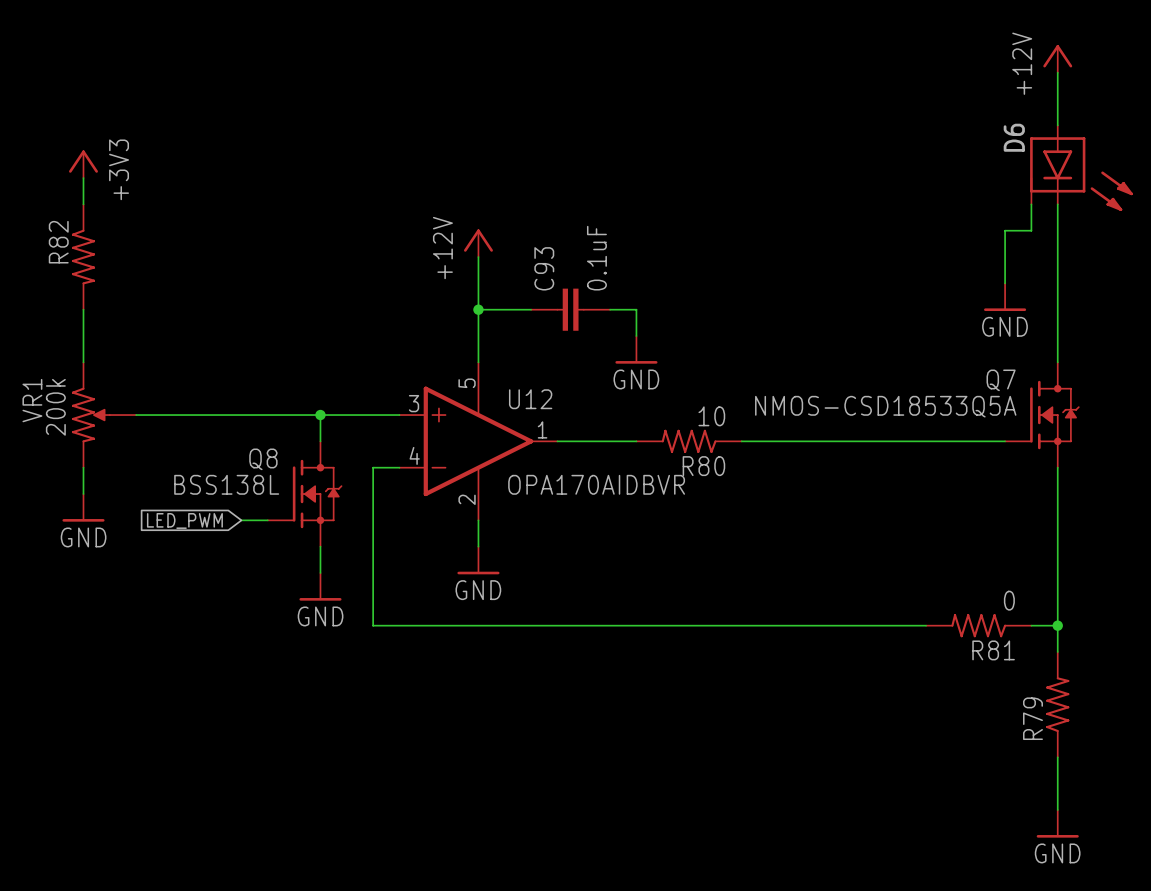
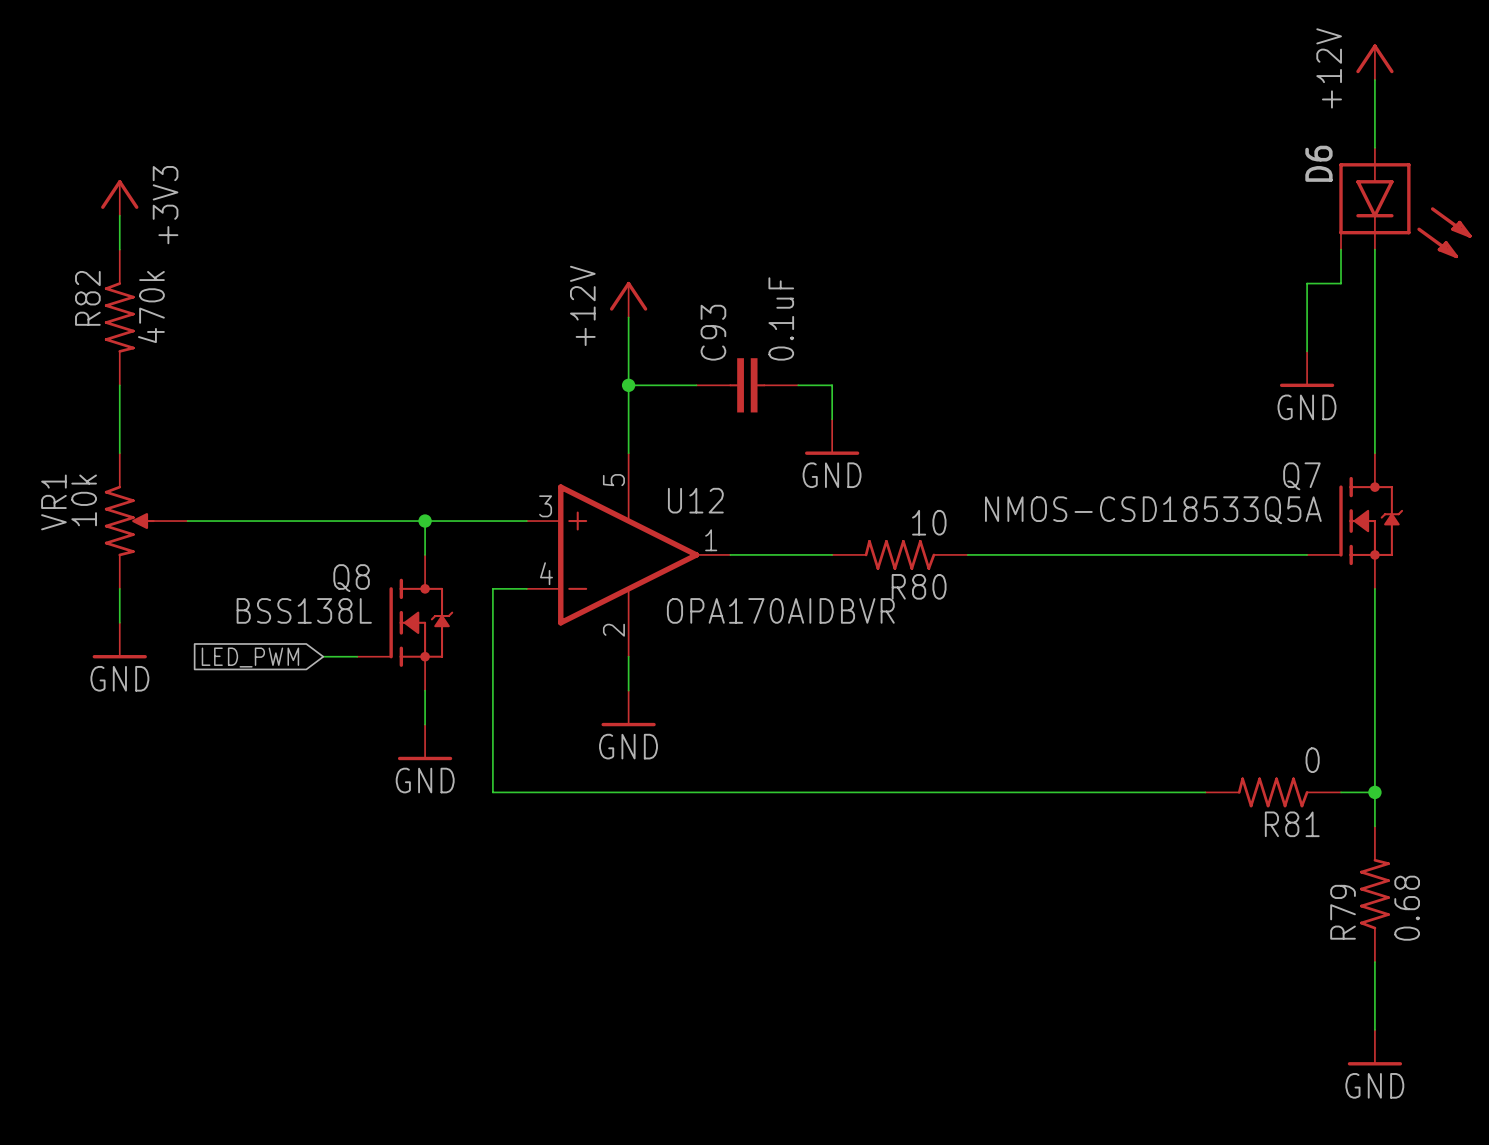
R82 value: none -> 470k (151, 307)
VR1 value: 200k (55, 407) -> 10k (84, 500)
R79 value: none -> 0.68 (1407, 908)

